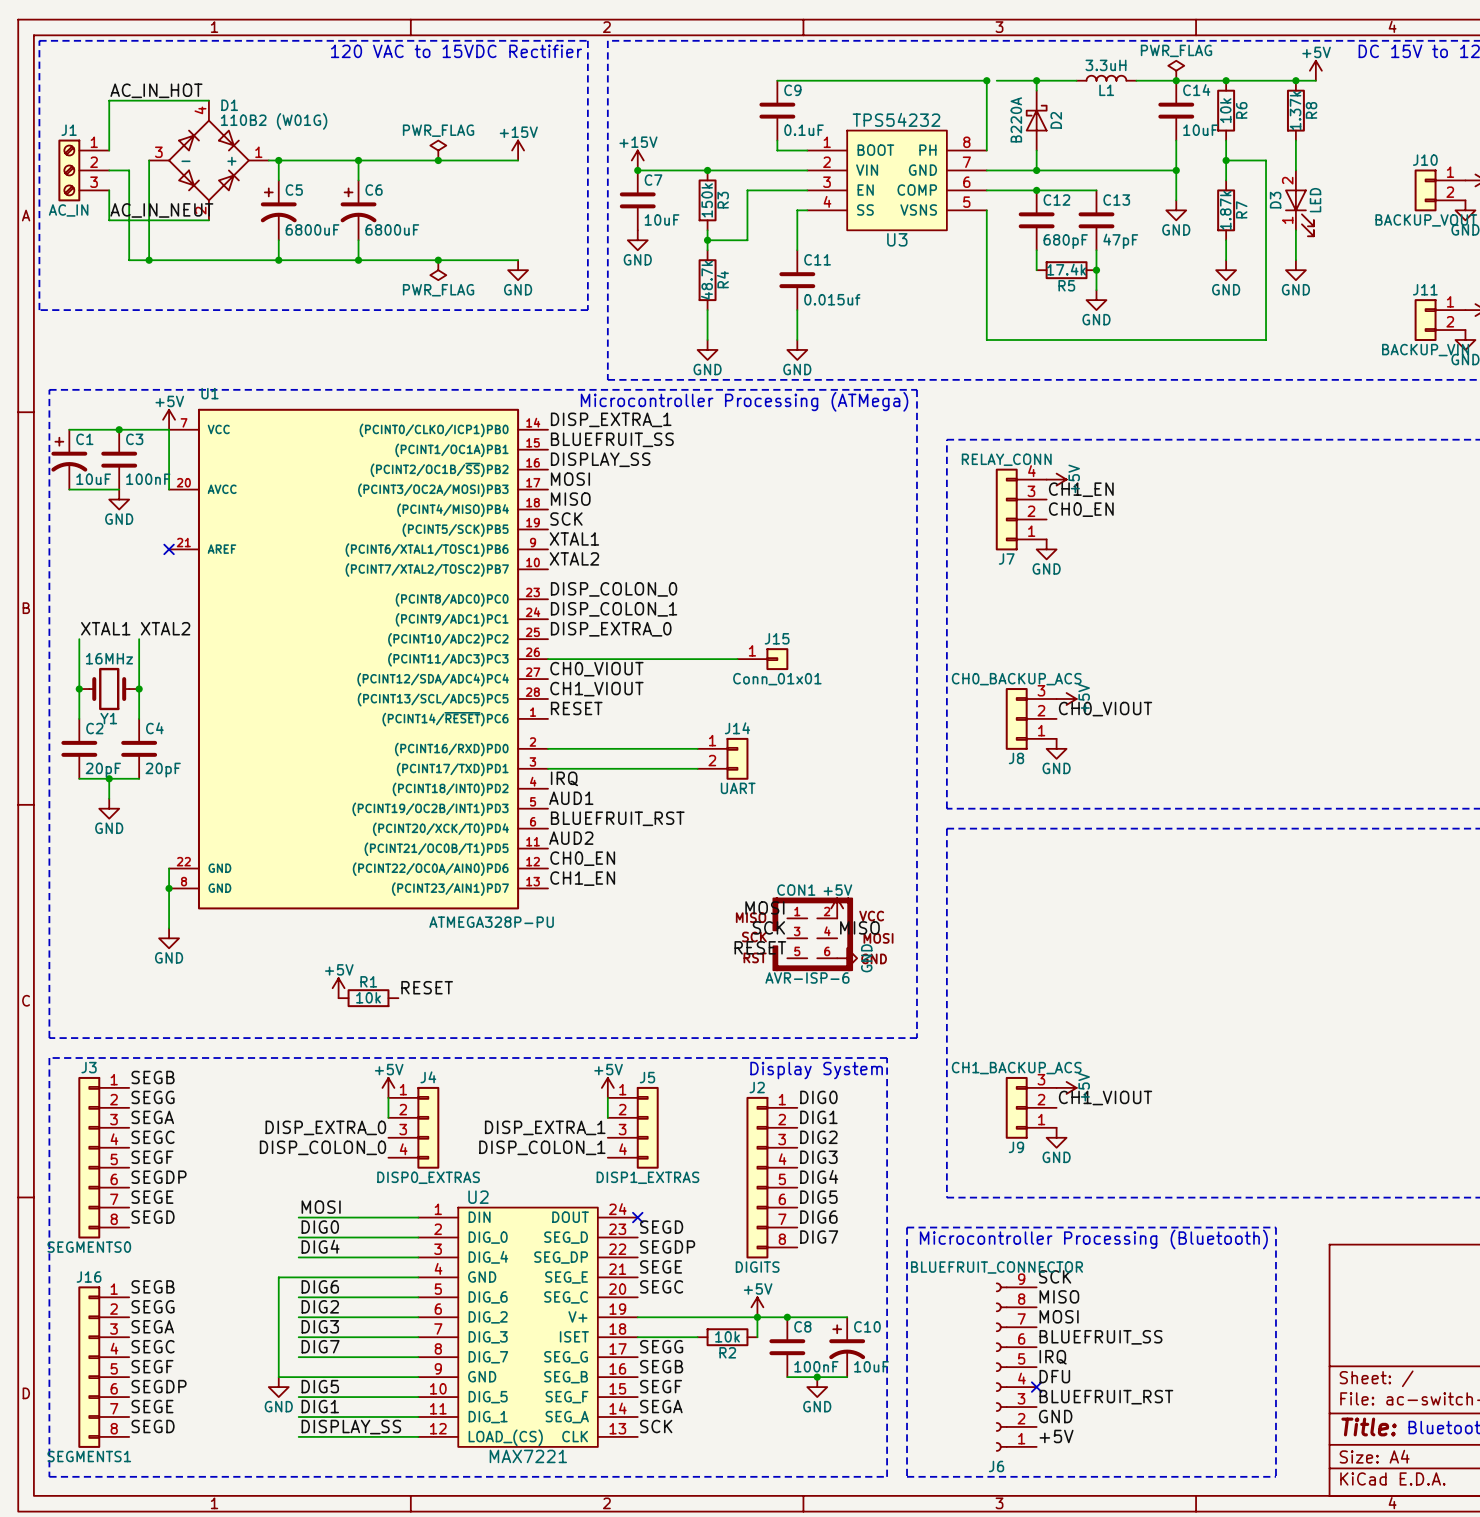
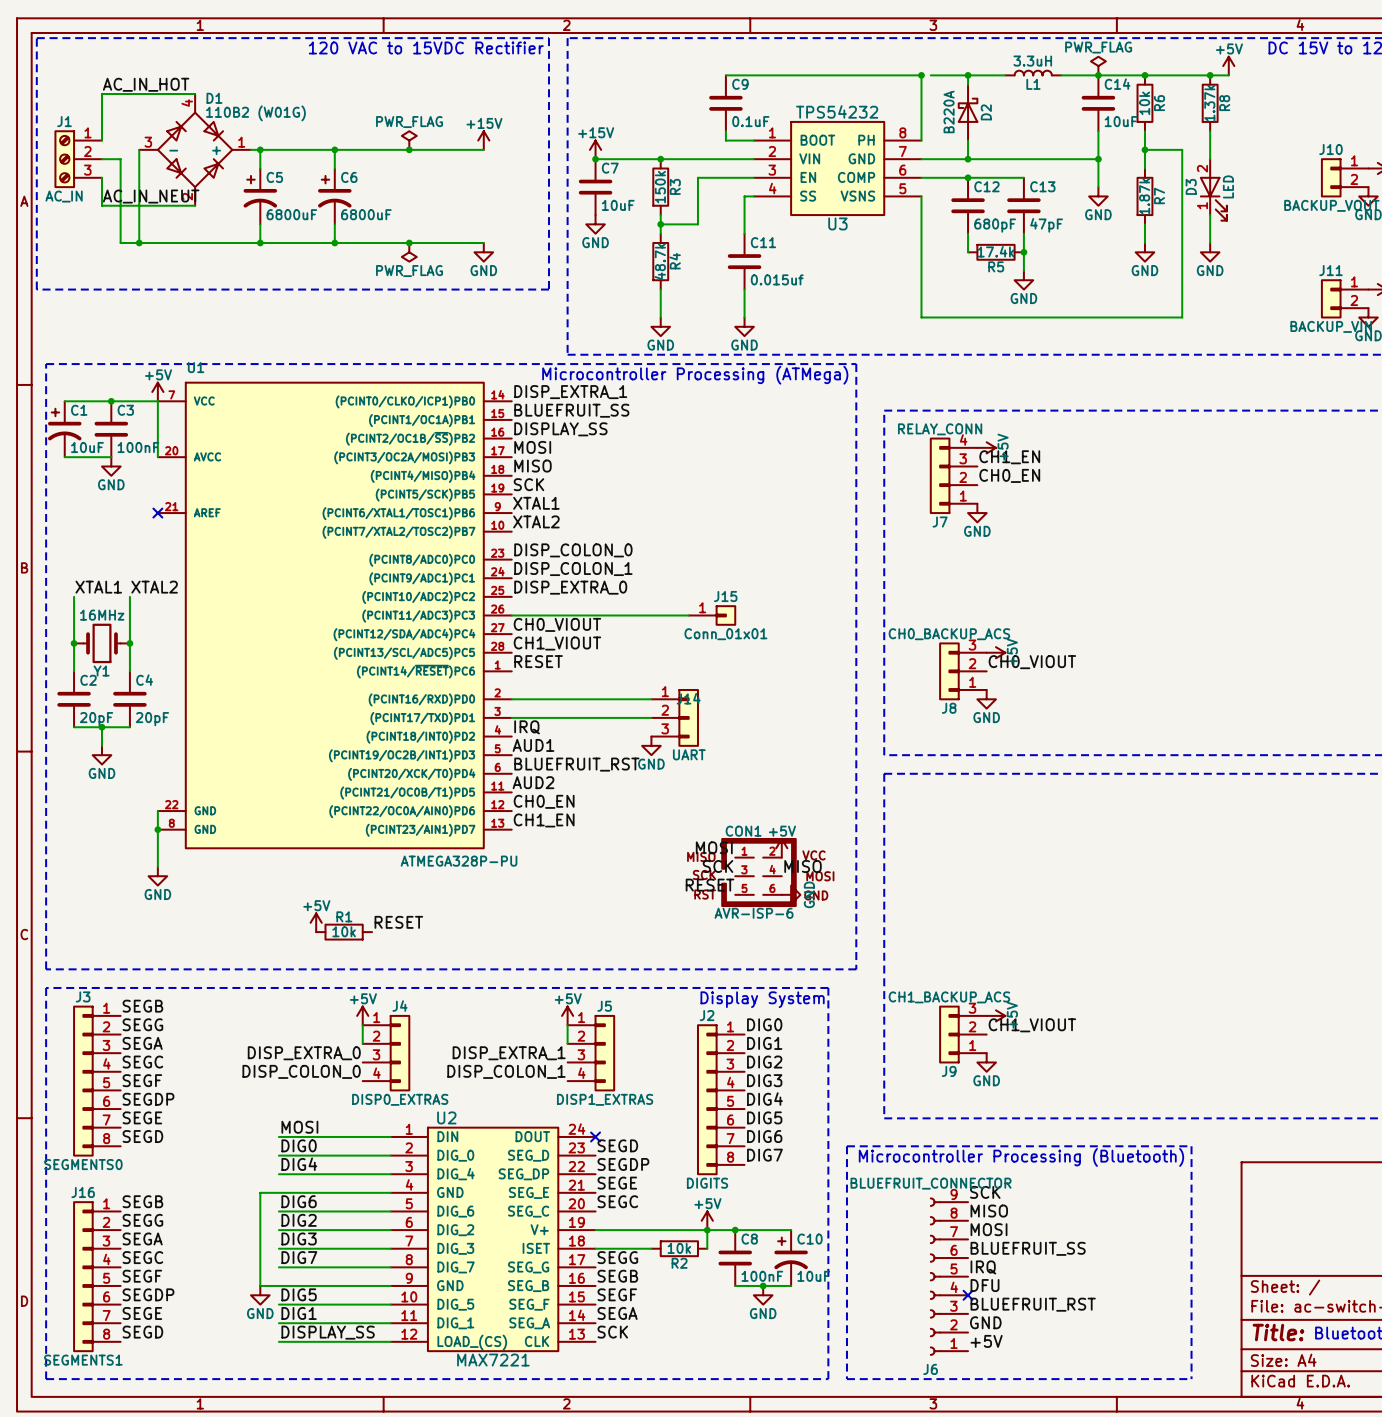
J14 symbol: [697, 737, 749, 780] -> [651, 689, 699, 747]
power symbol: none -> GND (651, 745)

